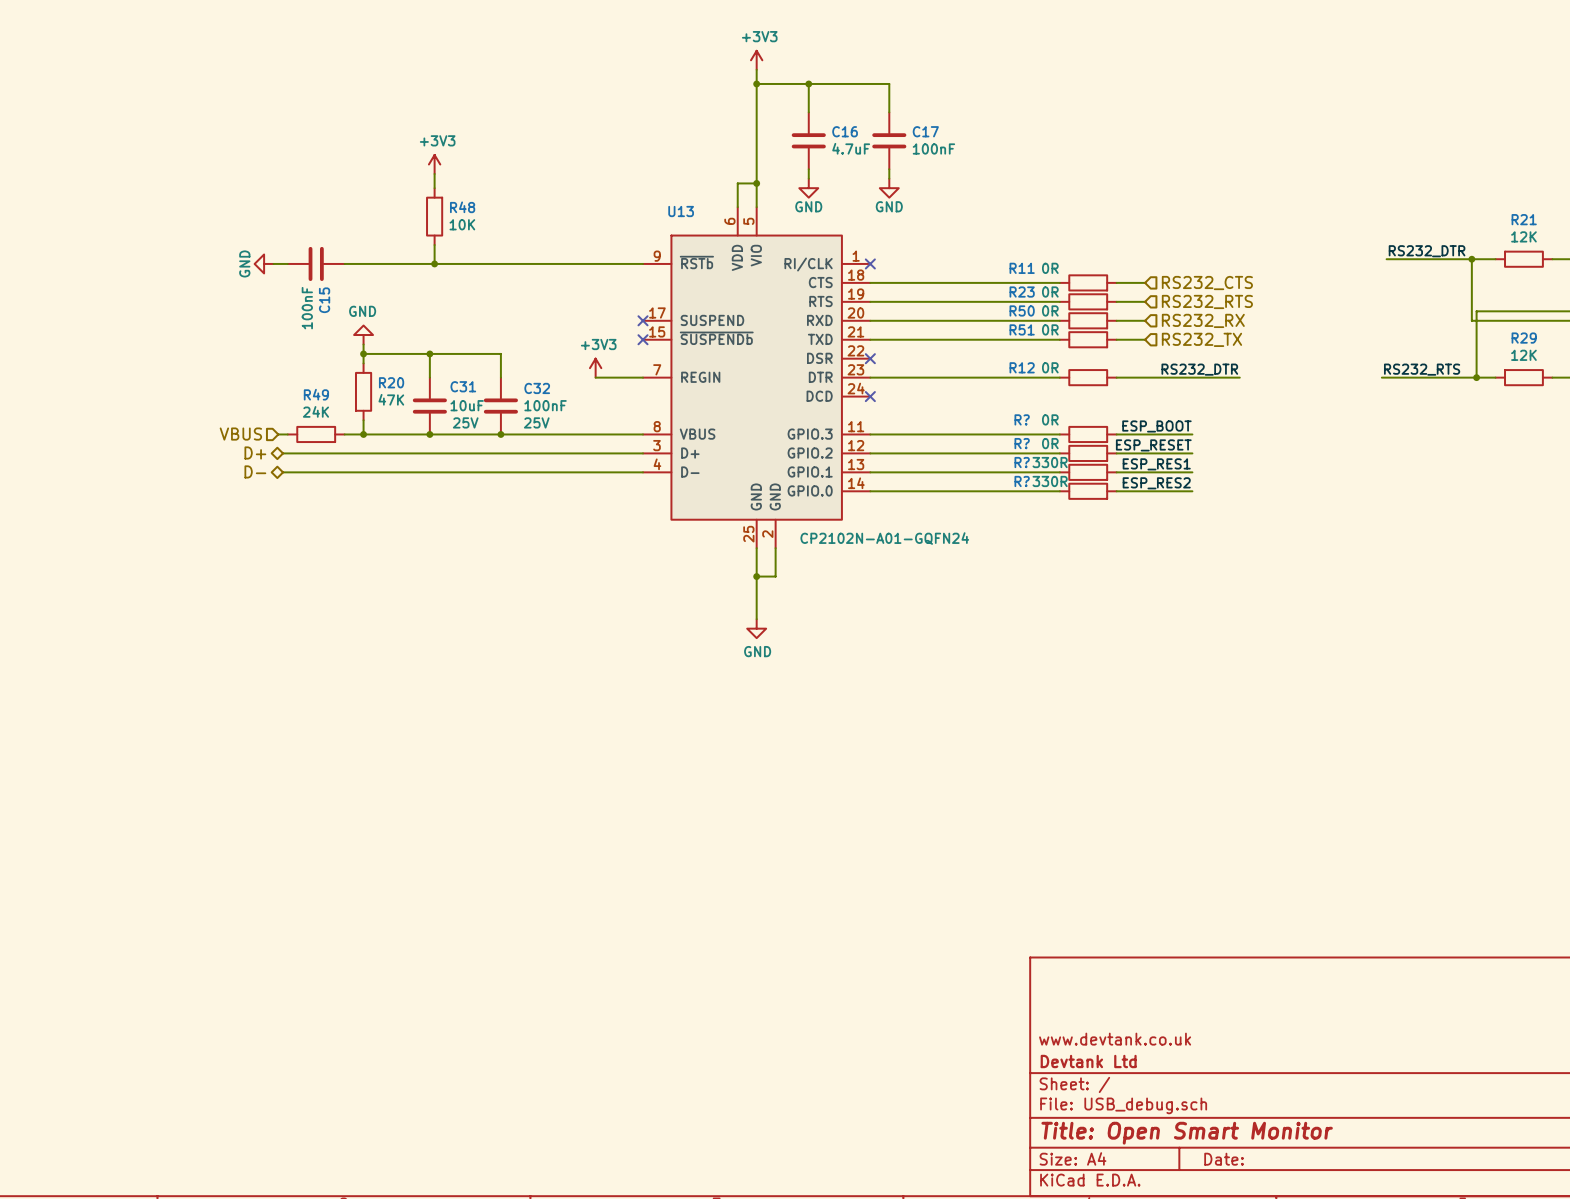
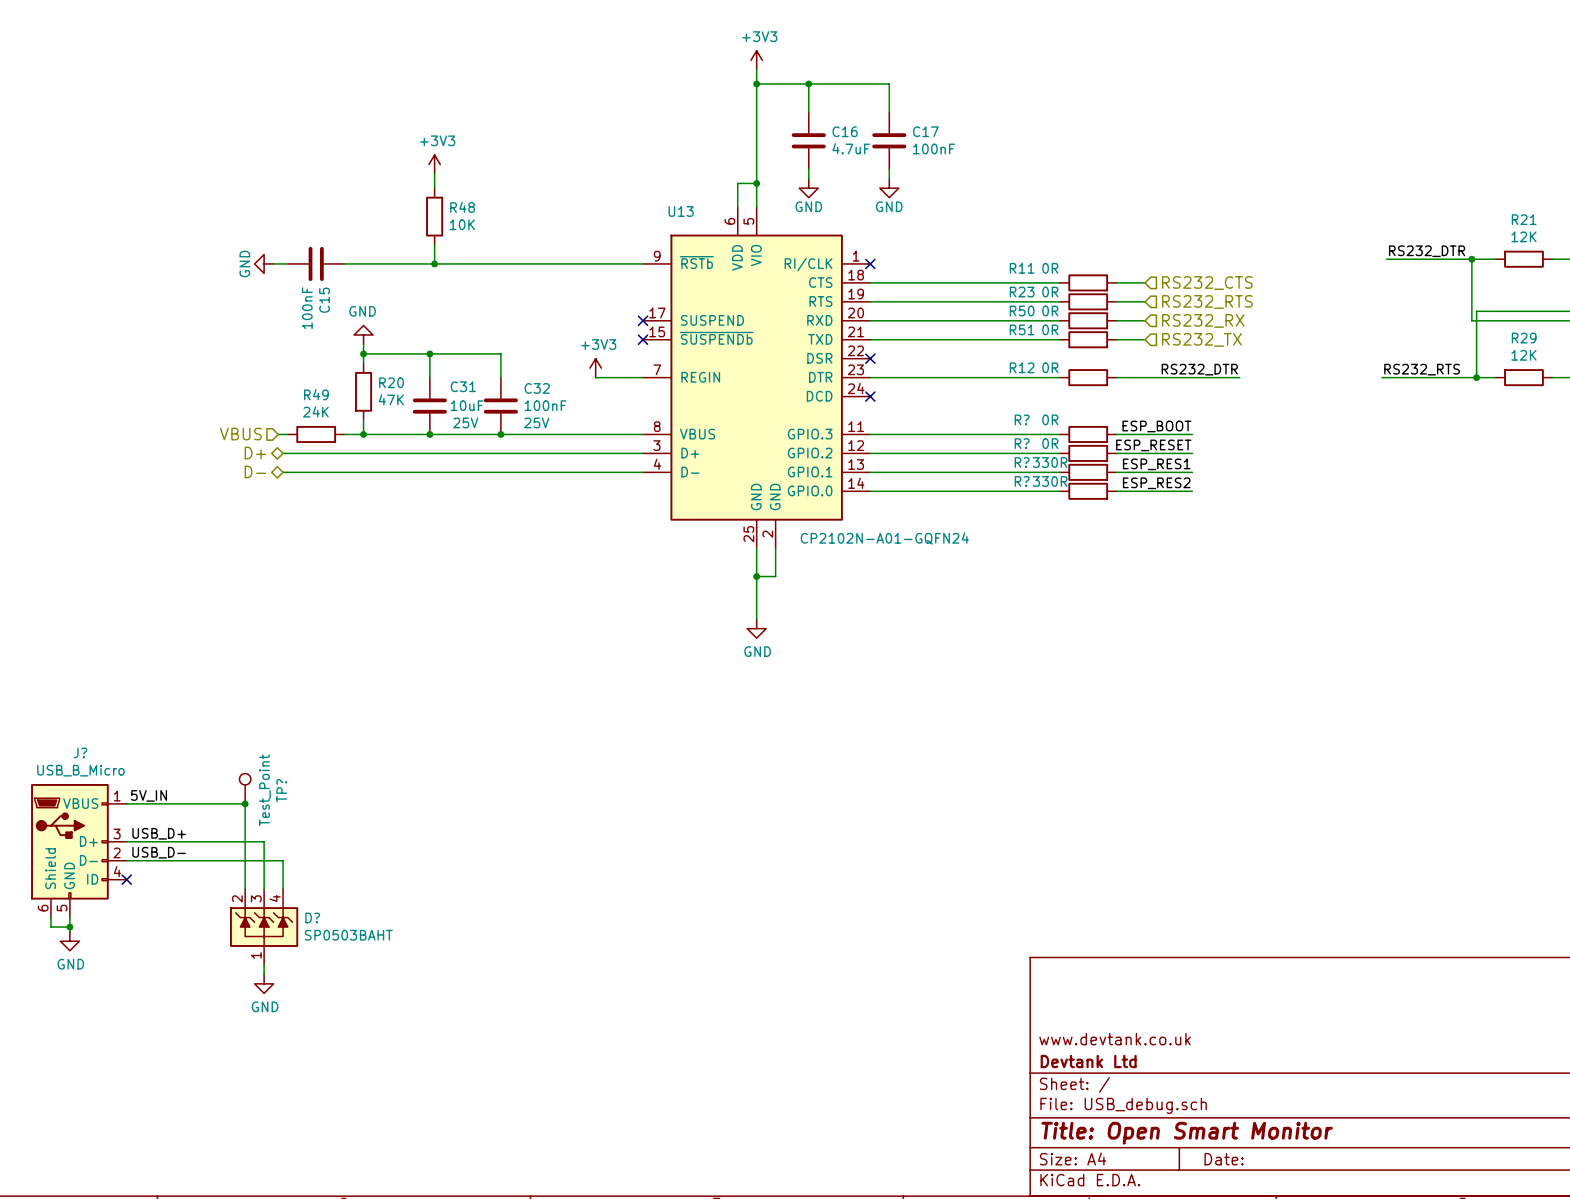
TP?: none -> Test_Point (245, 788)
label: none -> 5V_IN (149, 795)
wire: none -> (126, 803) (245, 803) (245, 889)
junction: none -> (245, 803)
label: none -> USB_D+ (159, 833)
wire: none -> (126, 841) (264, 841) (264, 889)
J?: none -> USB_B_Micro (78, 850)
label: none -> USB_D- (159, 852)
wire: none -> (126, 860) (283, 860) (283, 889)
no-connect mark: none -> (126, 879)
wire: none -> (50, 917) (50, 927) (69, 927)
wire: none -> (69, 917) (69, 931)
junction: none -> (69, 927)
D?: none -> SP0503BAHT (264, 927)
power symbol: none -> GND (69, 941)
wire: none -> (264, 964) (264, 974)
power symbol: none -> GND (264, 983)

